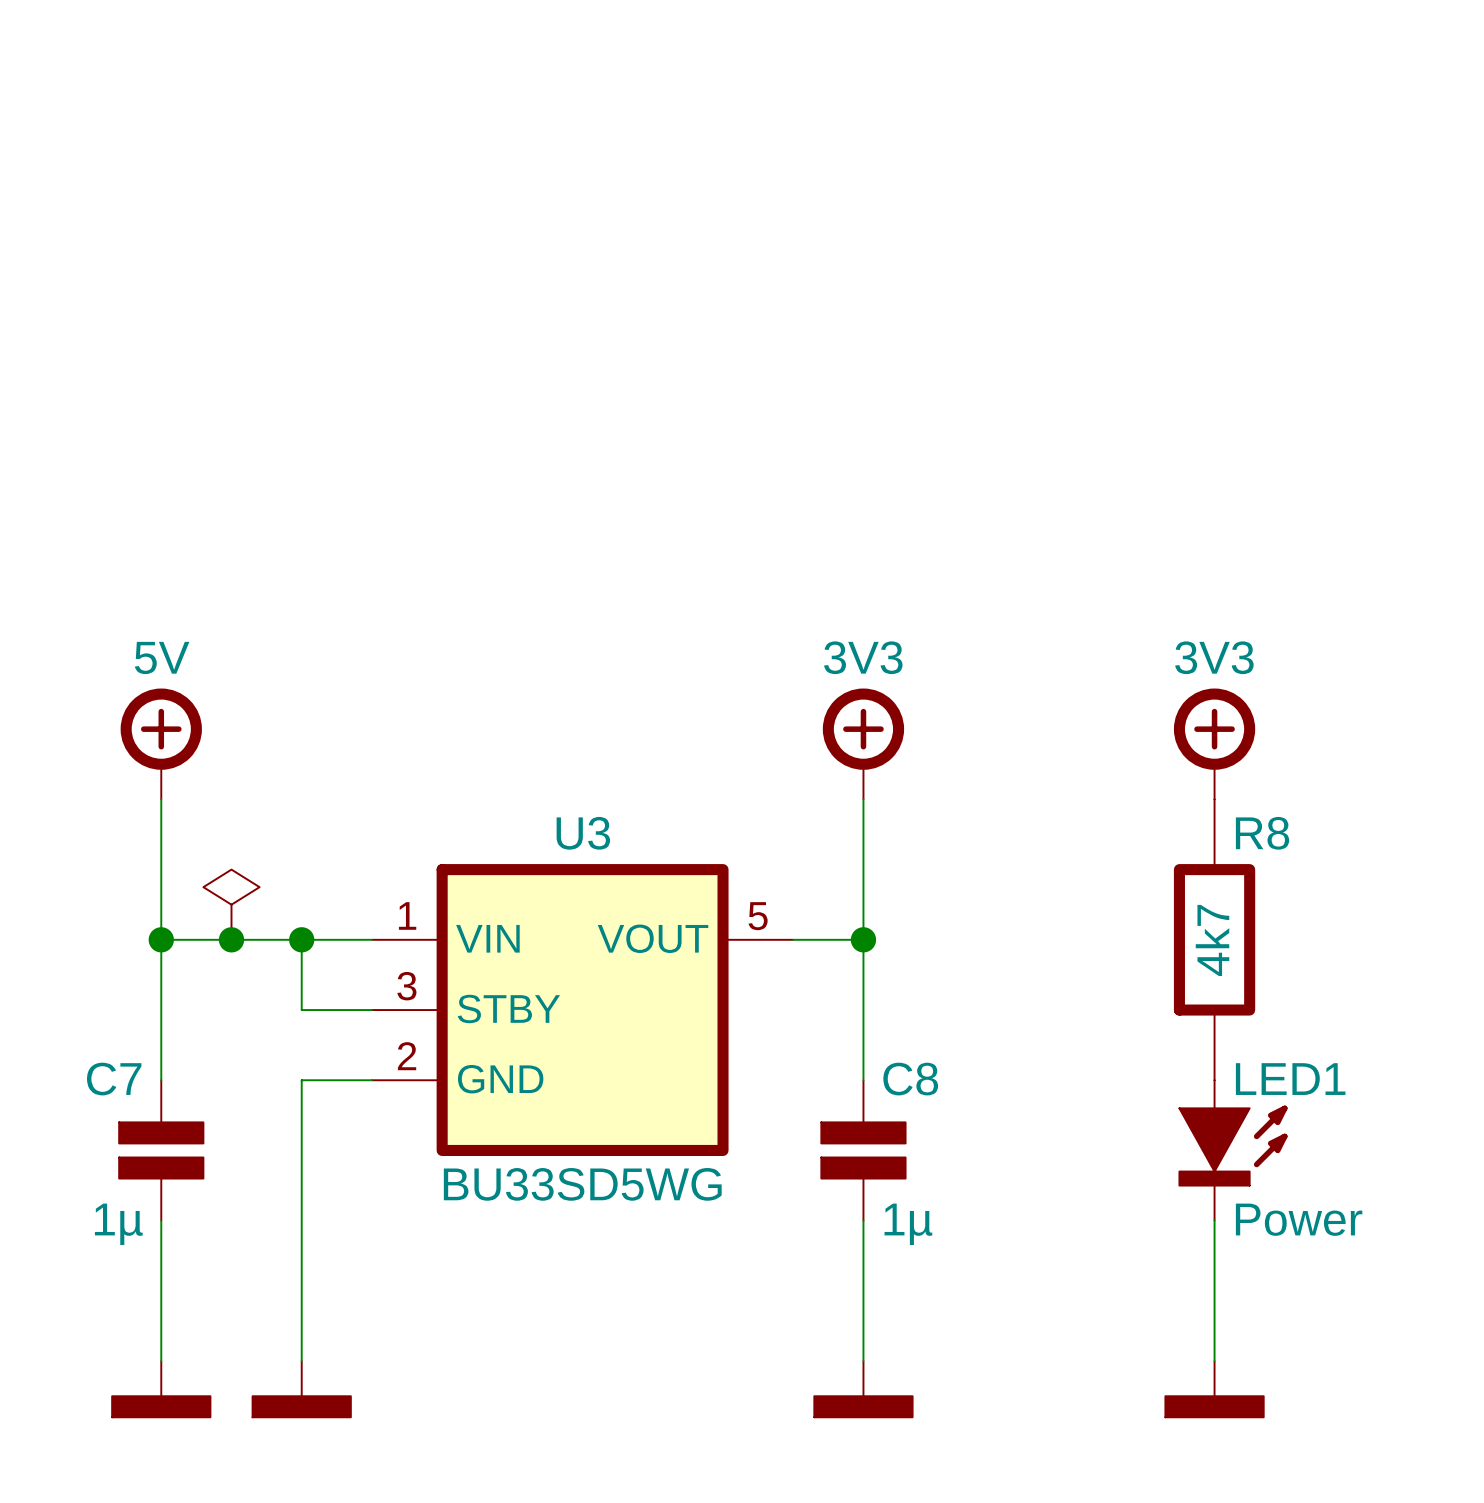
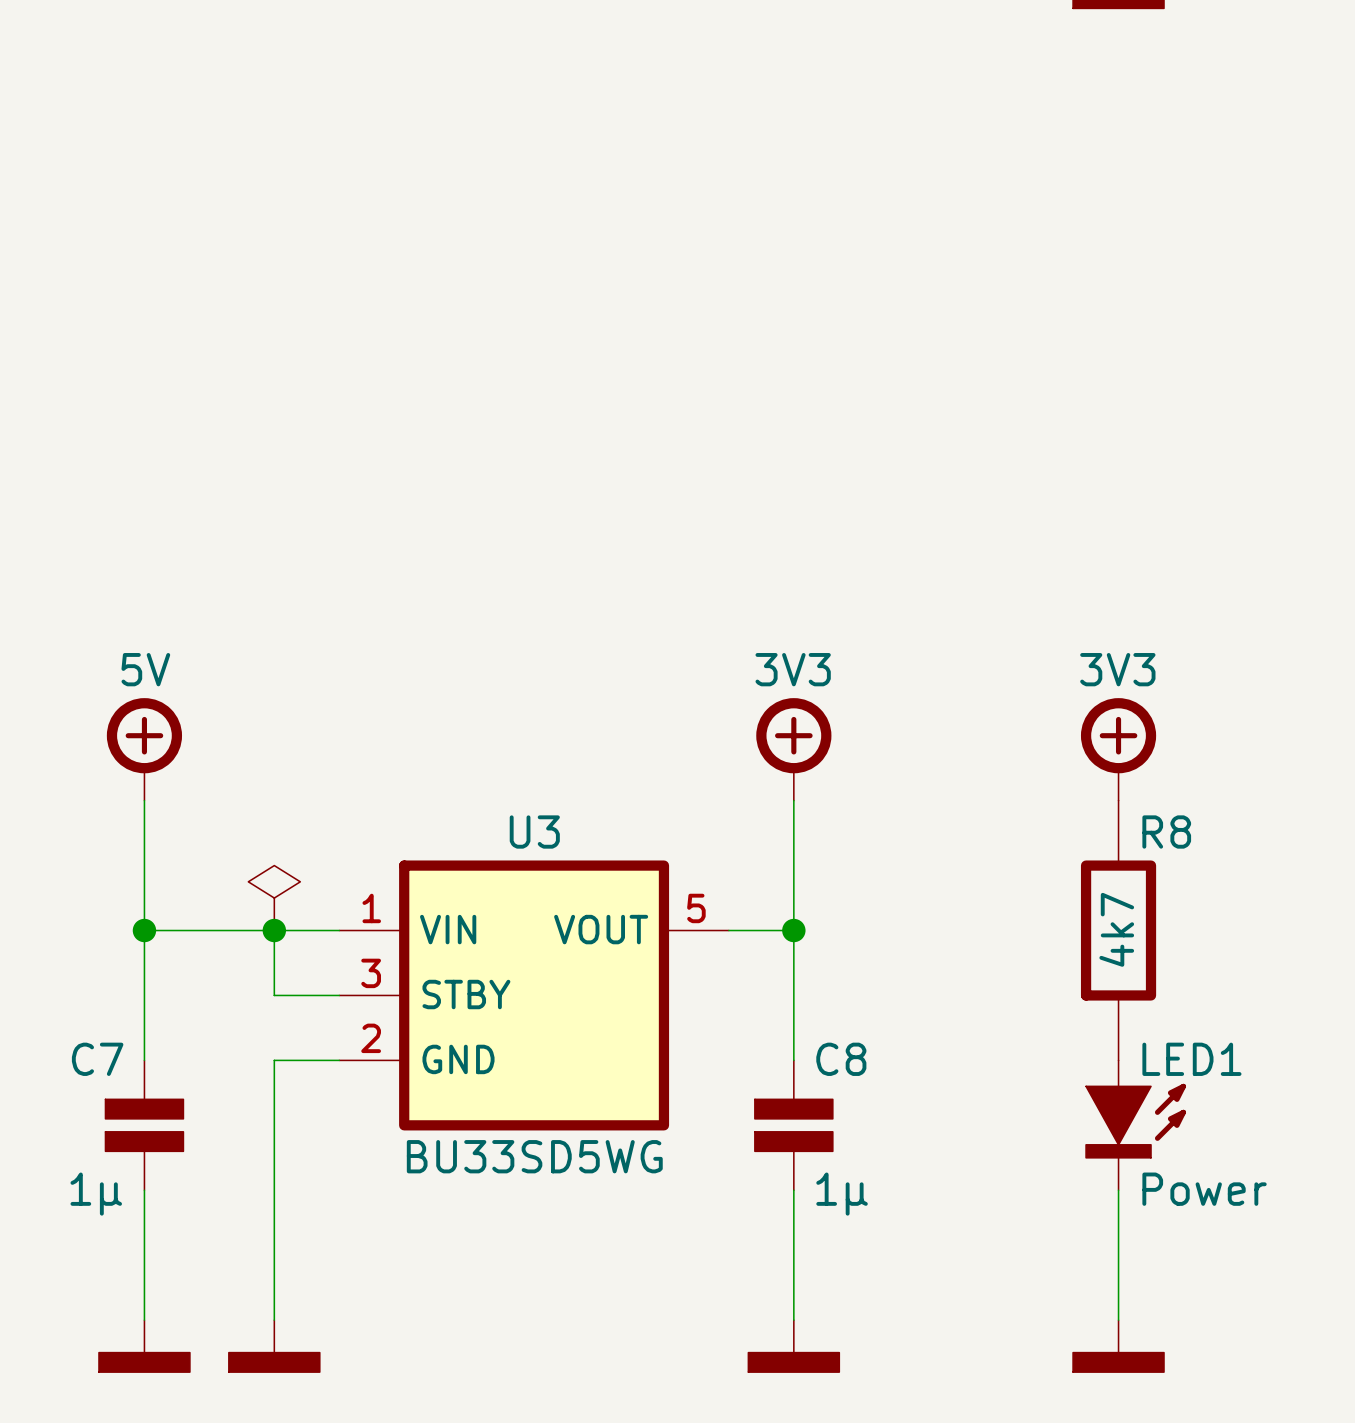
power symbol position: (231, 904) -> (274, 898)
junction: (231, 939) -> none

